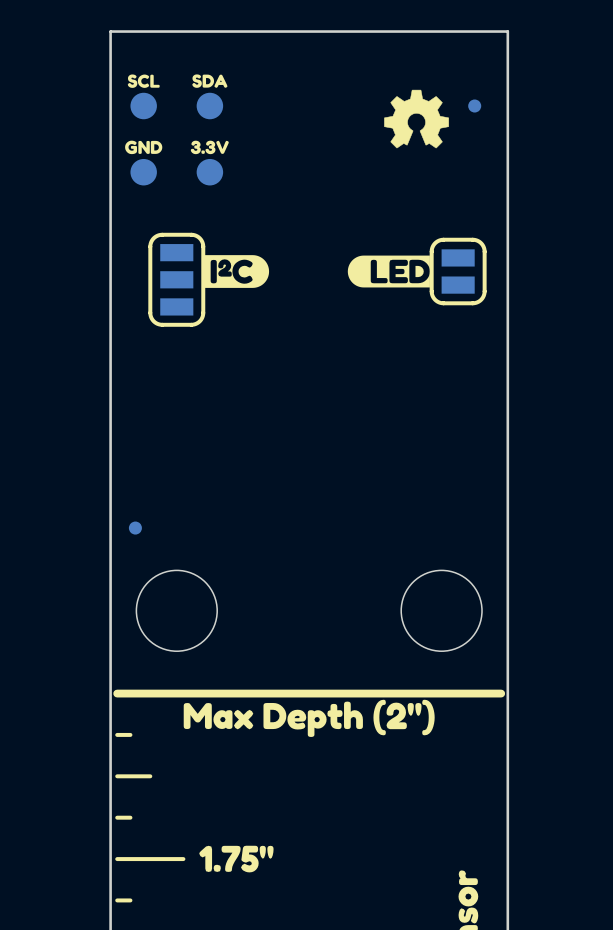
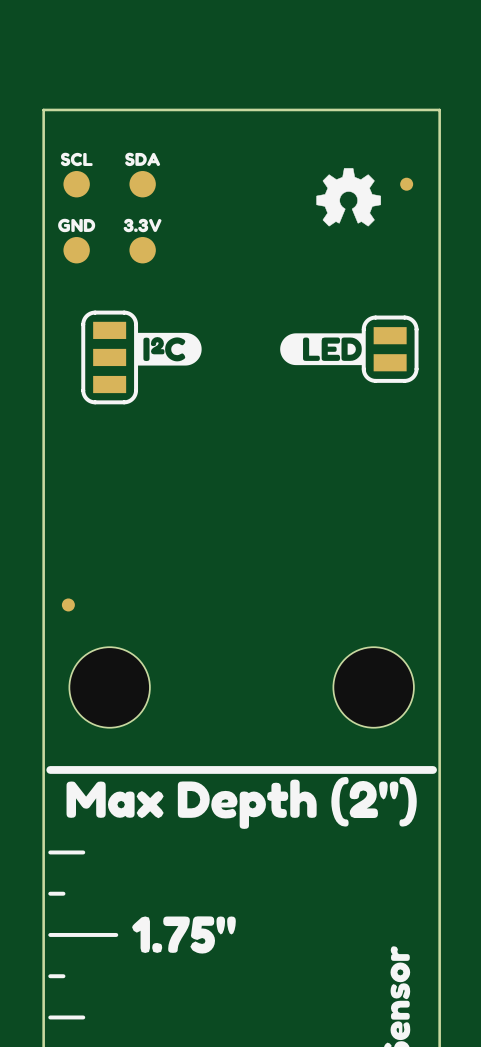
drawing shape: [183, 699, 435, 737] -> [66, 777, 417, 829]
line: (130, 734) (117, 734) -> none
drawing shape: [199, 845, 274, 873] -> [132, 916, 236, 954]

